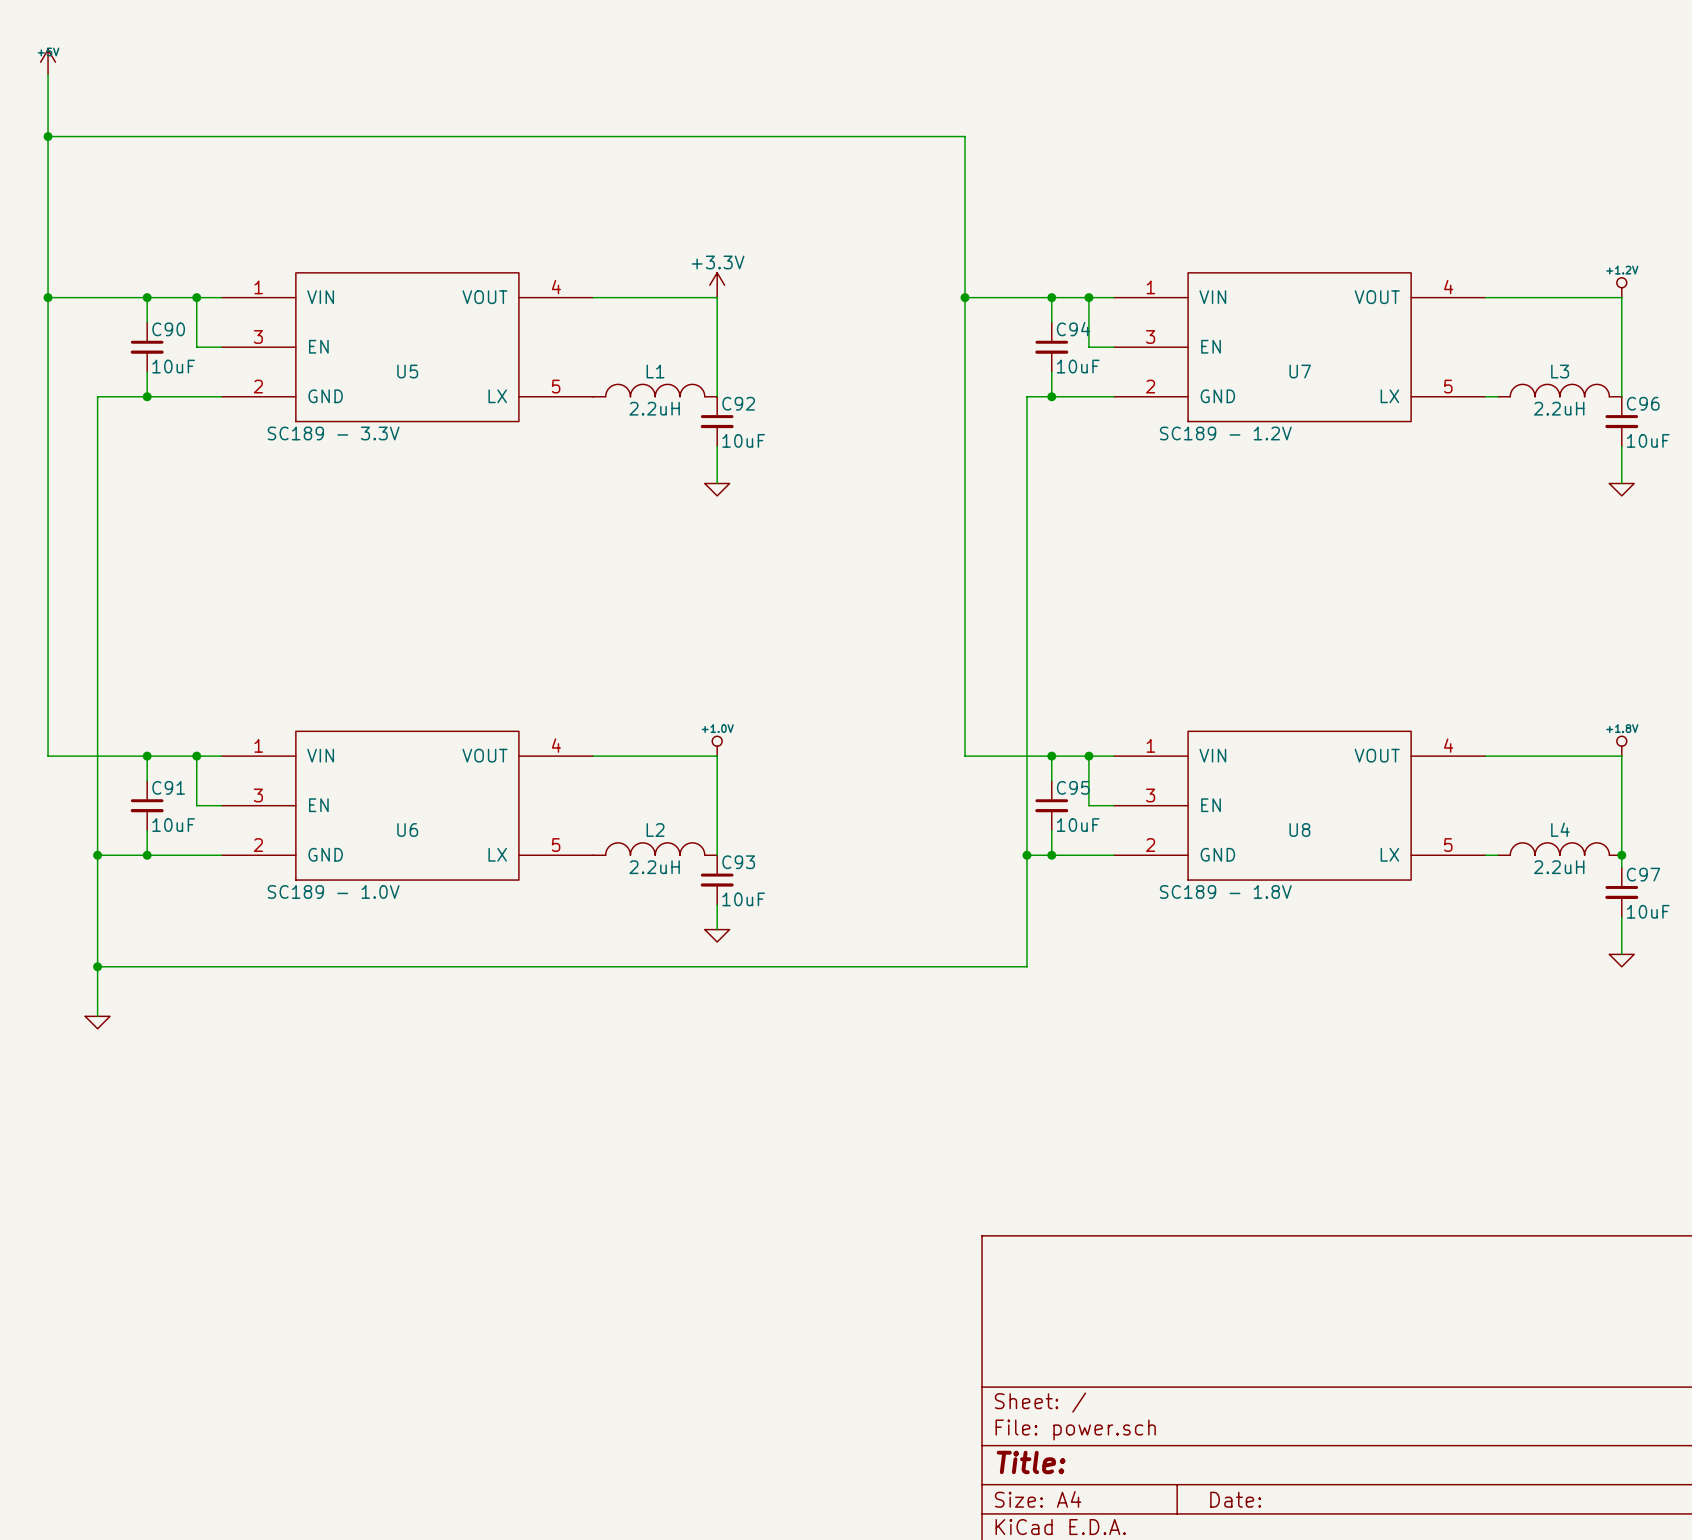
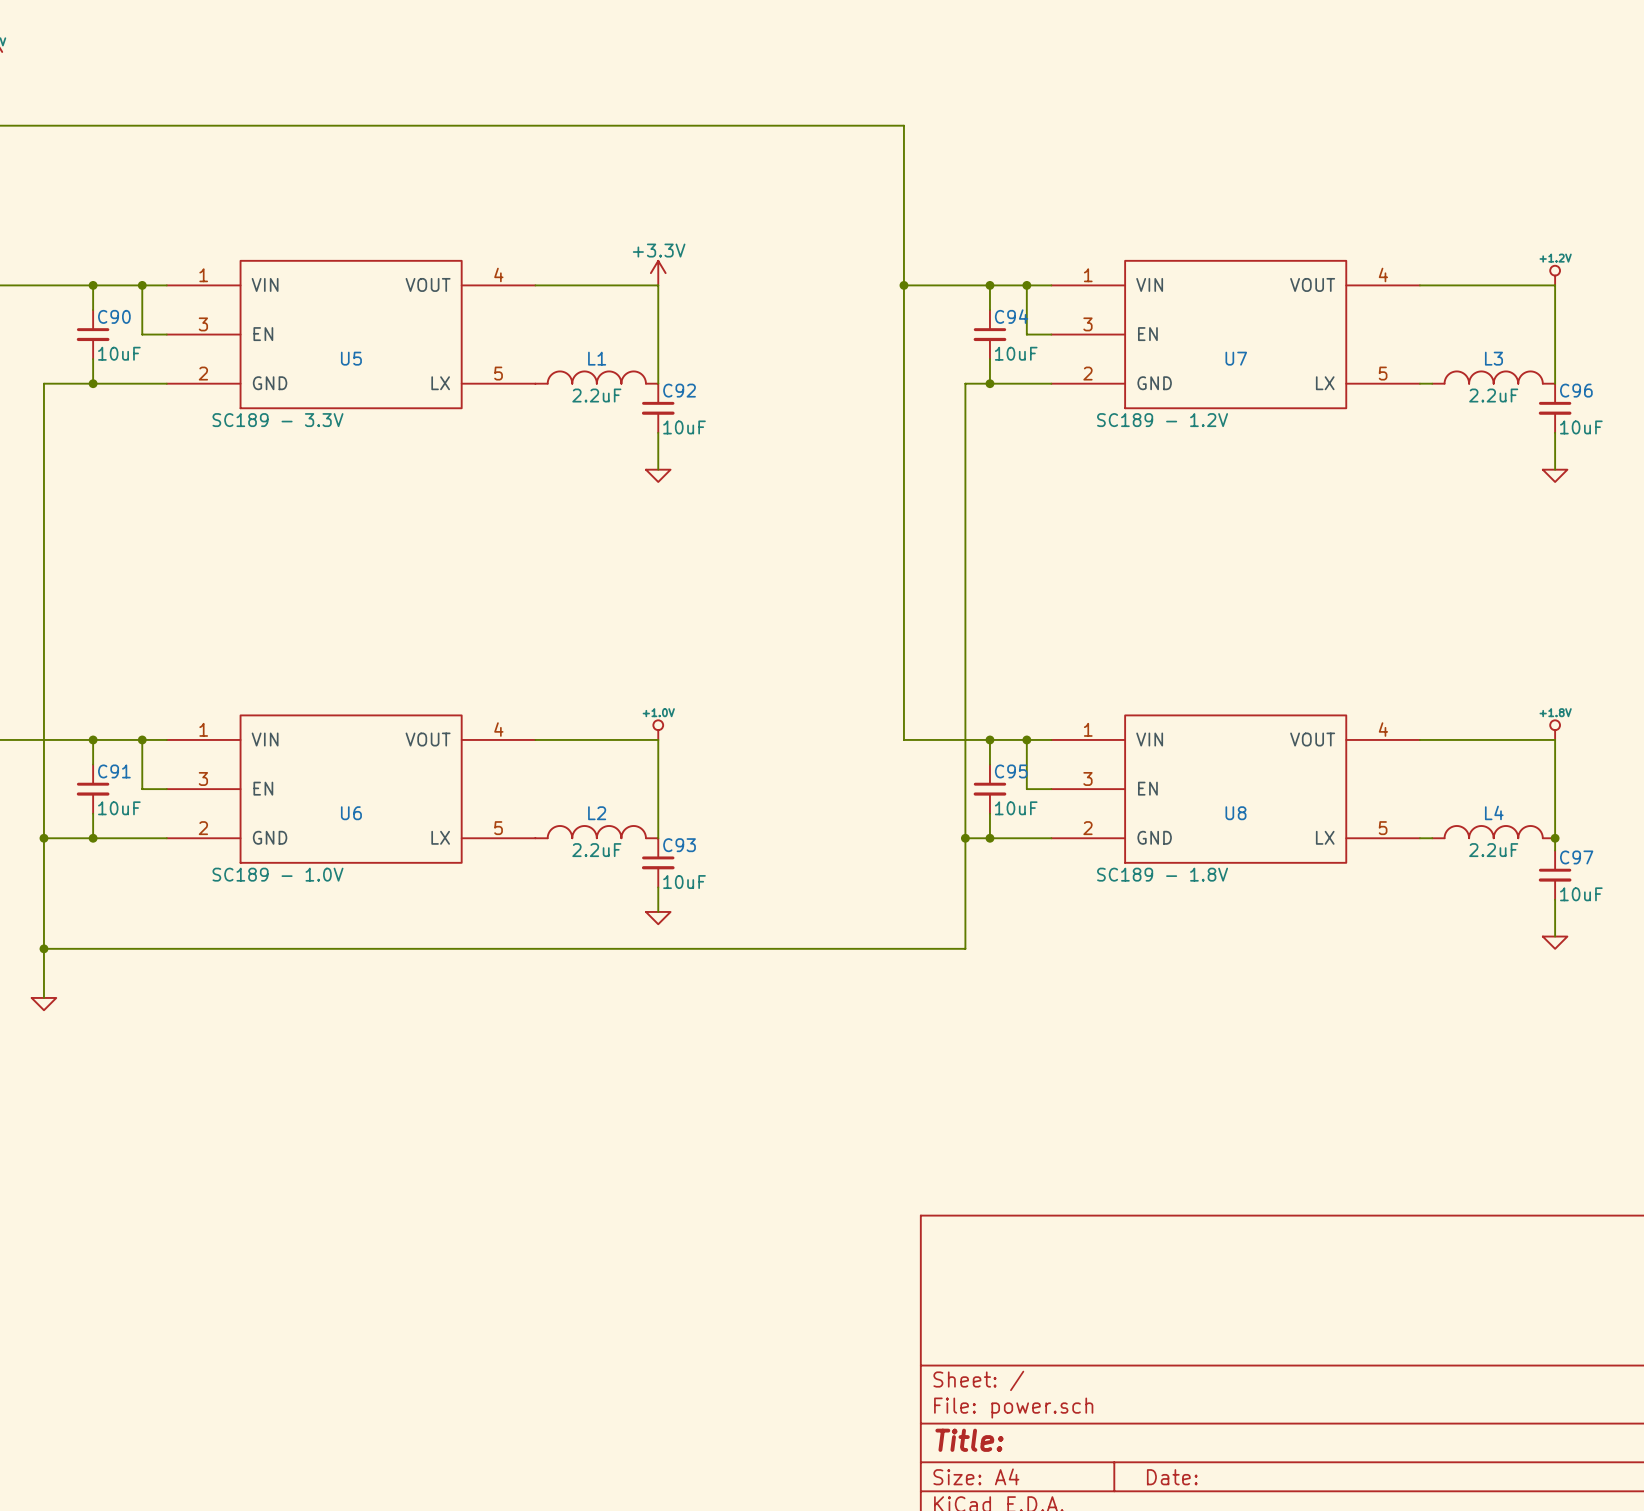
L1 value: 2.2uH (654, 408) -> 2.2uF (596, 395)
L3 value: 2.2uH (1559, 408) -> 2.2uF (1493, 395)
L2 value: 2.2uH (654, 867) -> 2.2uF (596, 850)
L4 value: 2.2uH (1559, 867) -> 2.2uF (1493, 850)

